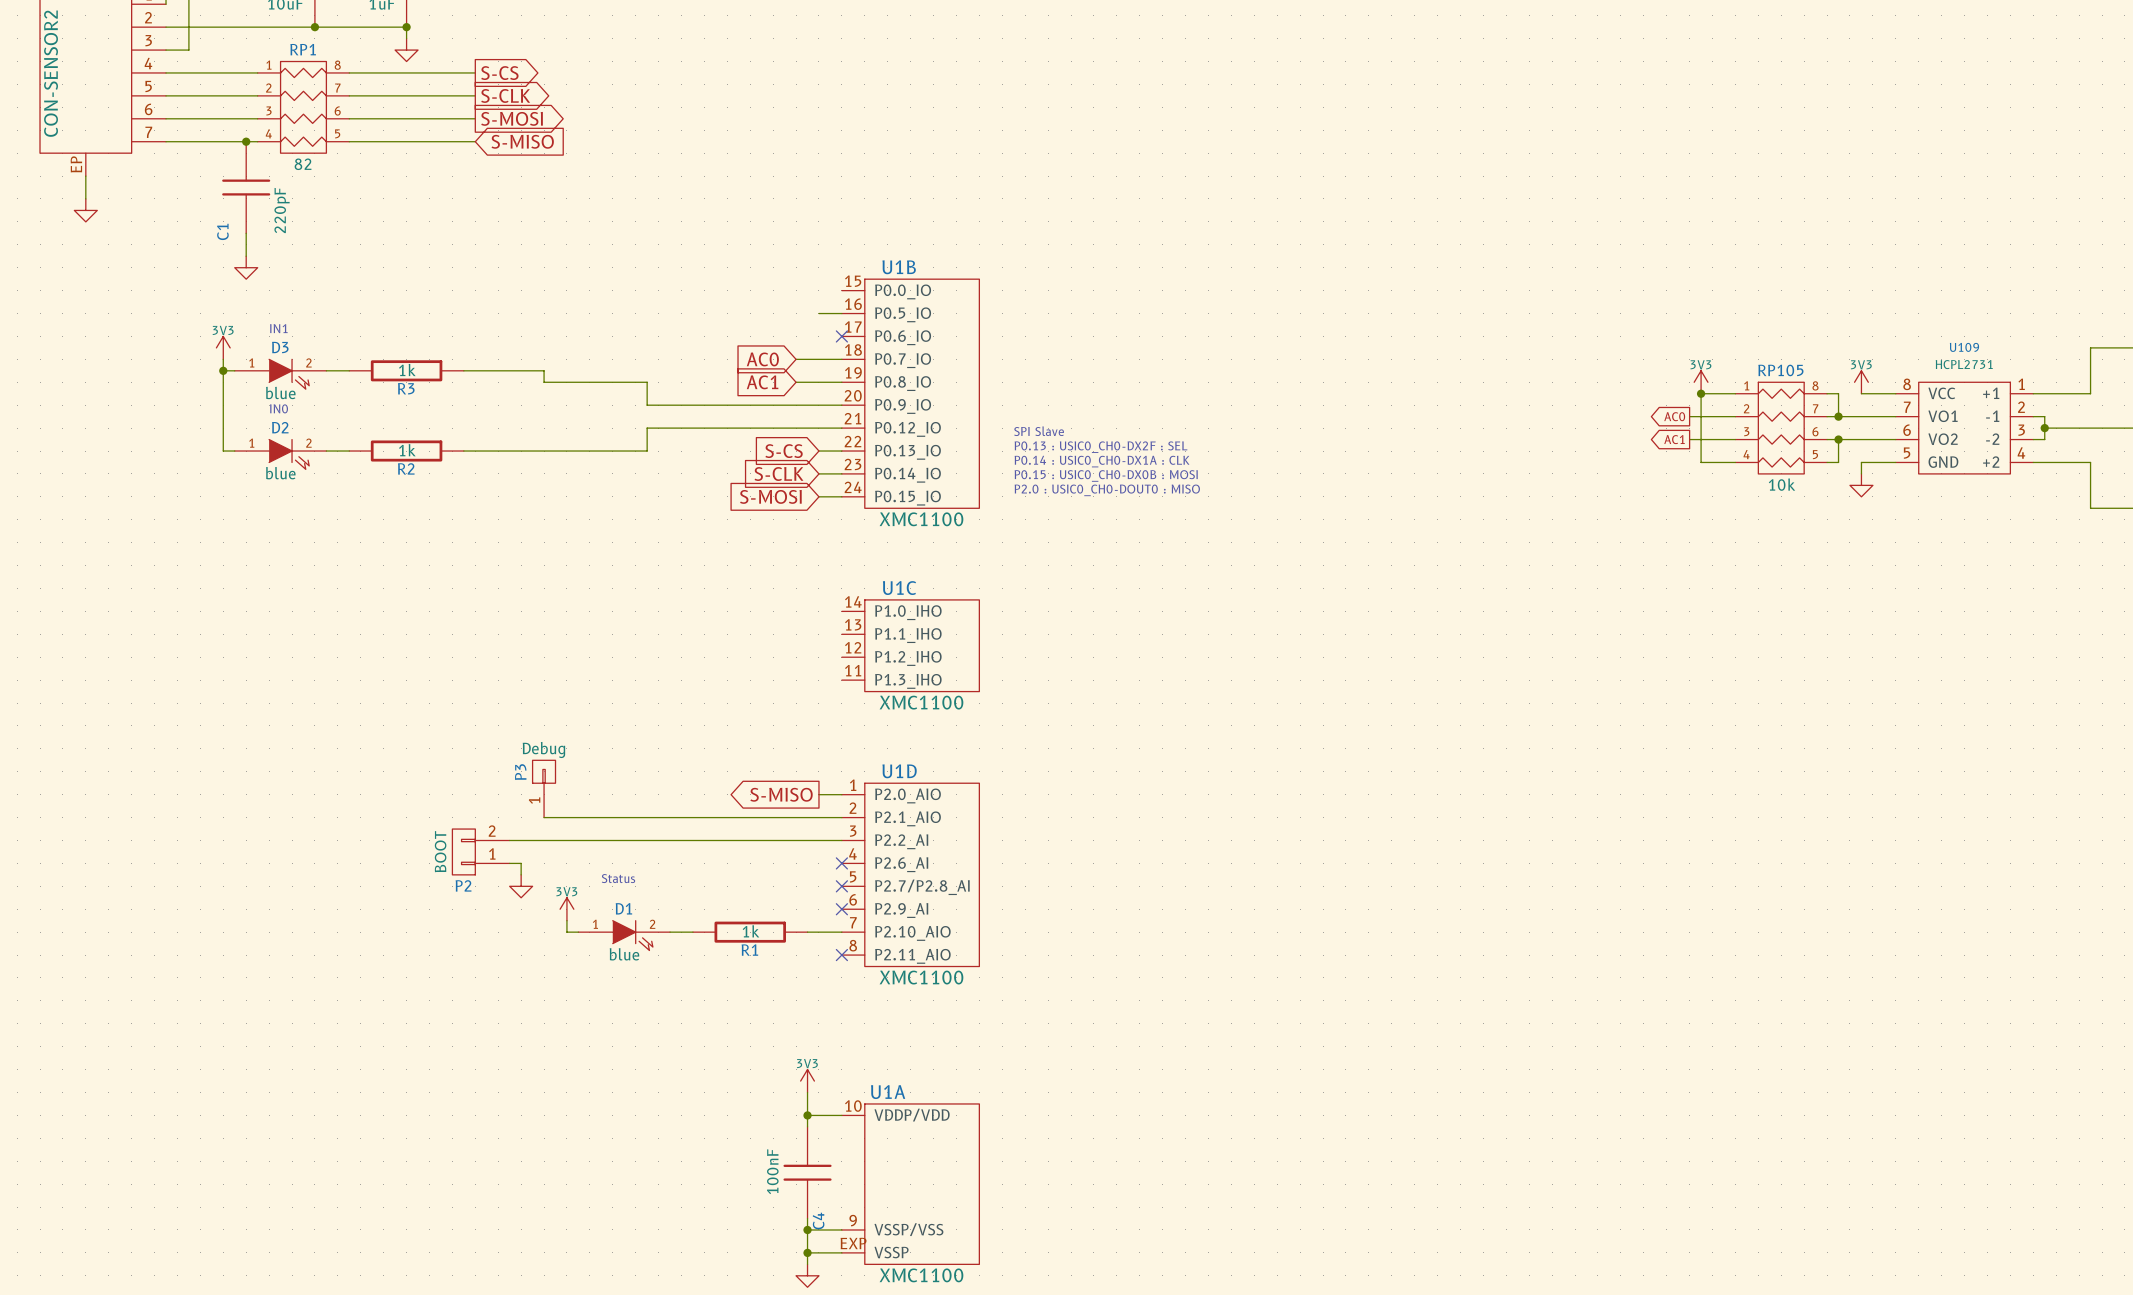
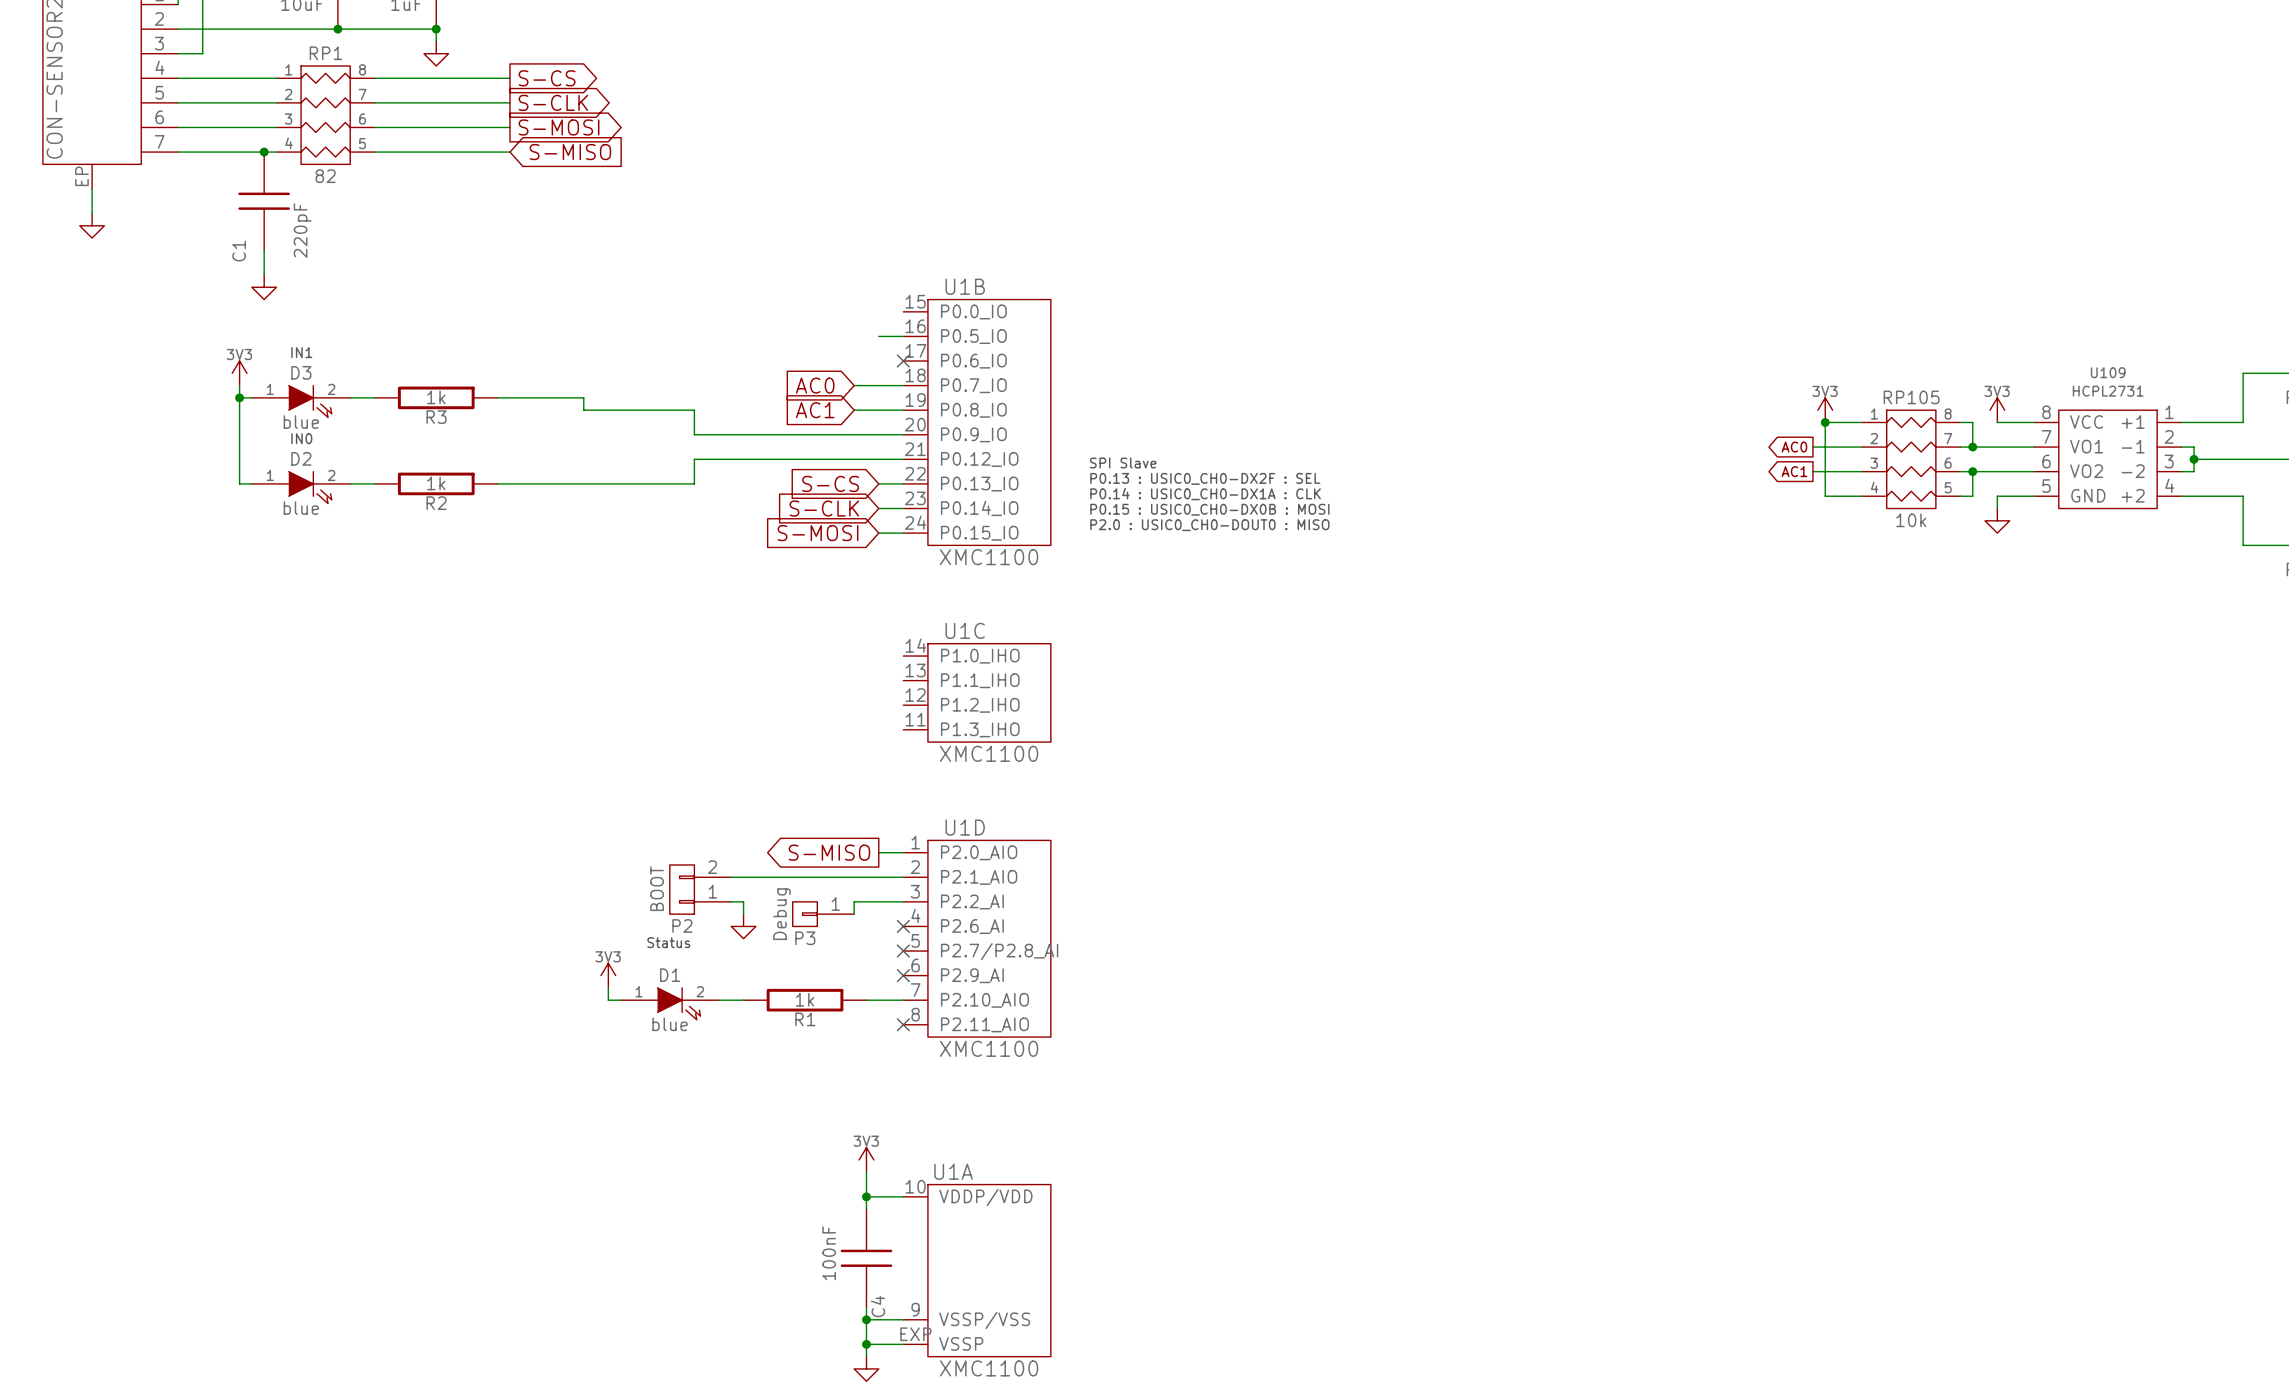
P3 rotation: 0° (544, 771) -> 90° counterclockwise (805, 914)
P3 position: (544, 788) -> (823, 914)
wire: (544, 817) (681, 817) -> none
wire: (509, 840) (681, 840) -> none
wire: (692, 840) (796, 840) -> (743, 901) (743, 914)
wire: none -> (854, 901) (854, 914)
P2 position: (481, 851) -> (700, 889)
wire: (509, 863) (521, 863) (521, 874) -> none
power symbol position: (521, 886) -> (743, 926)

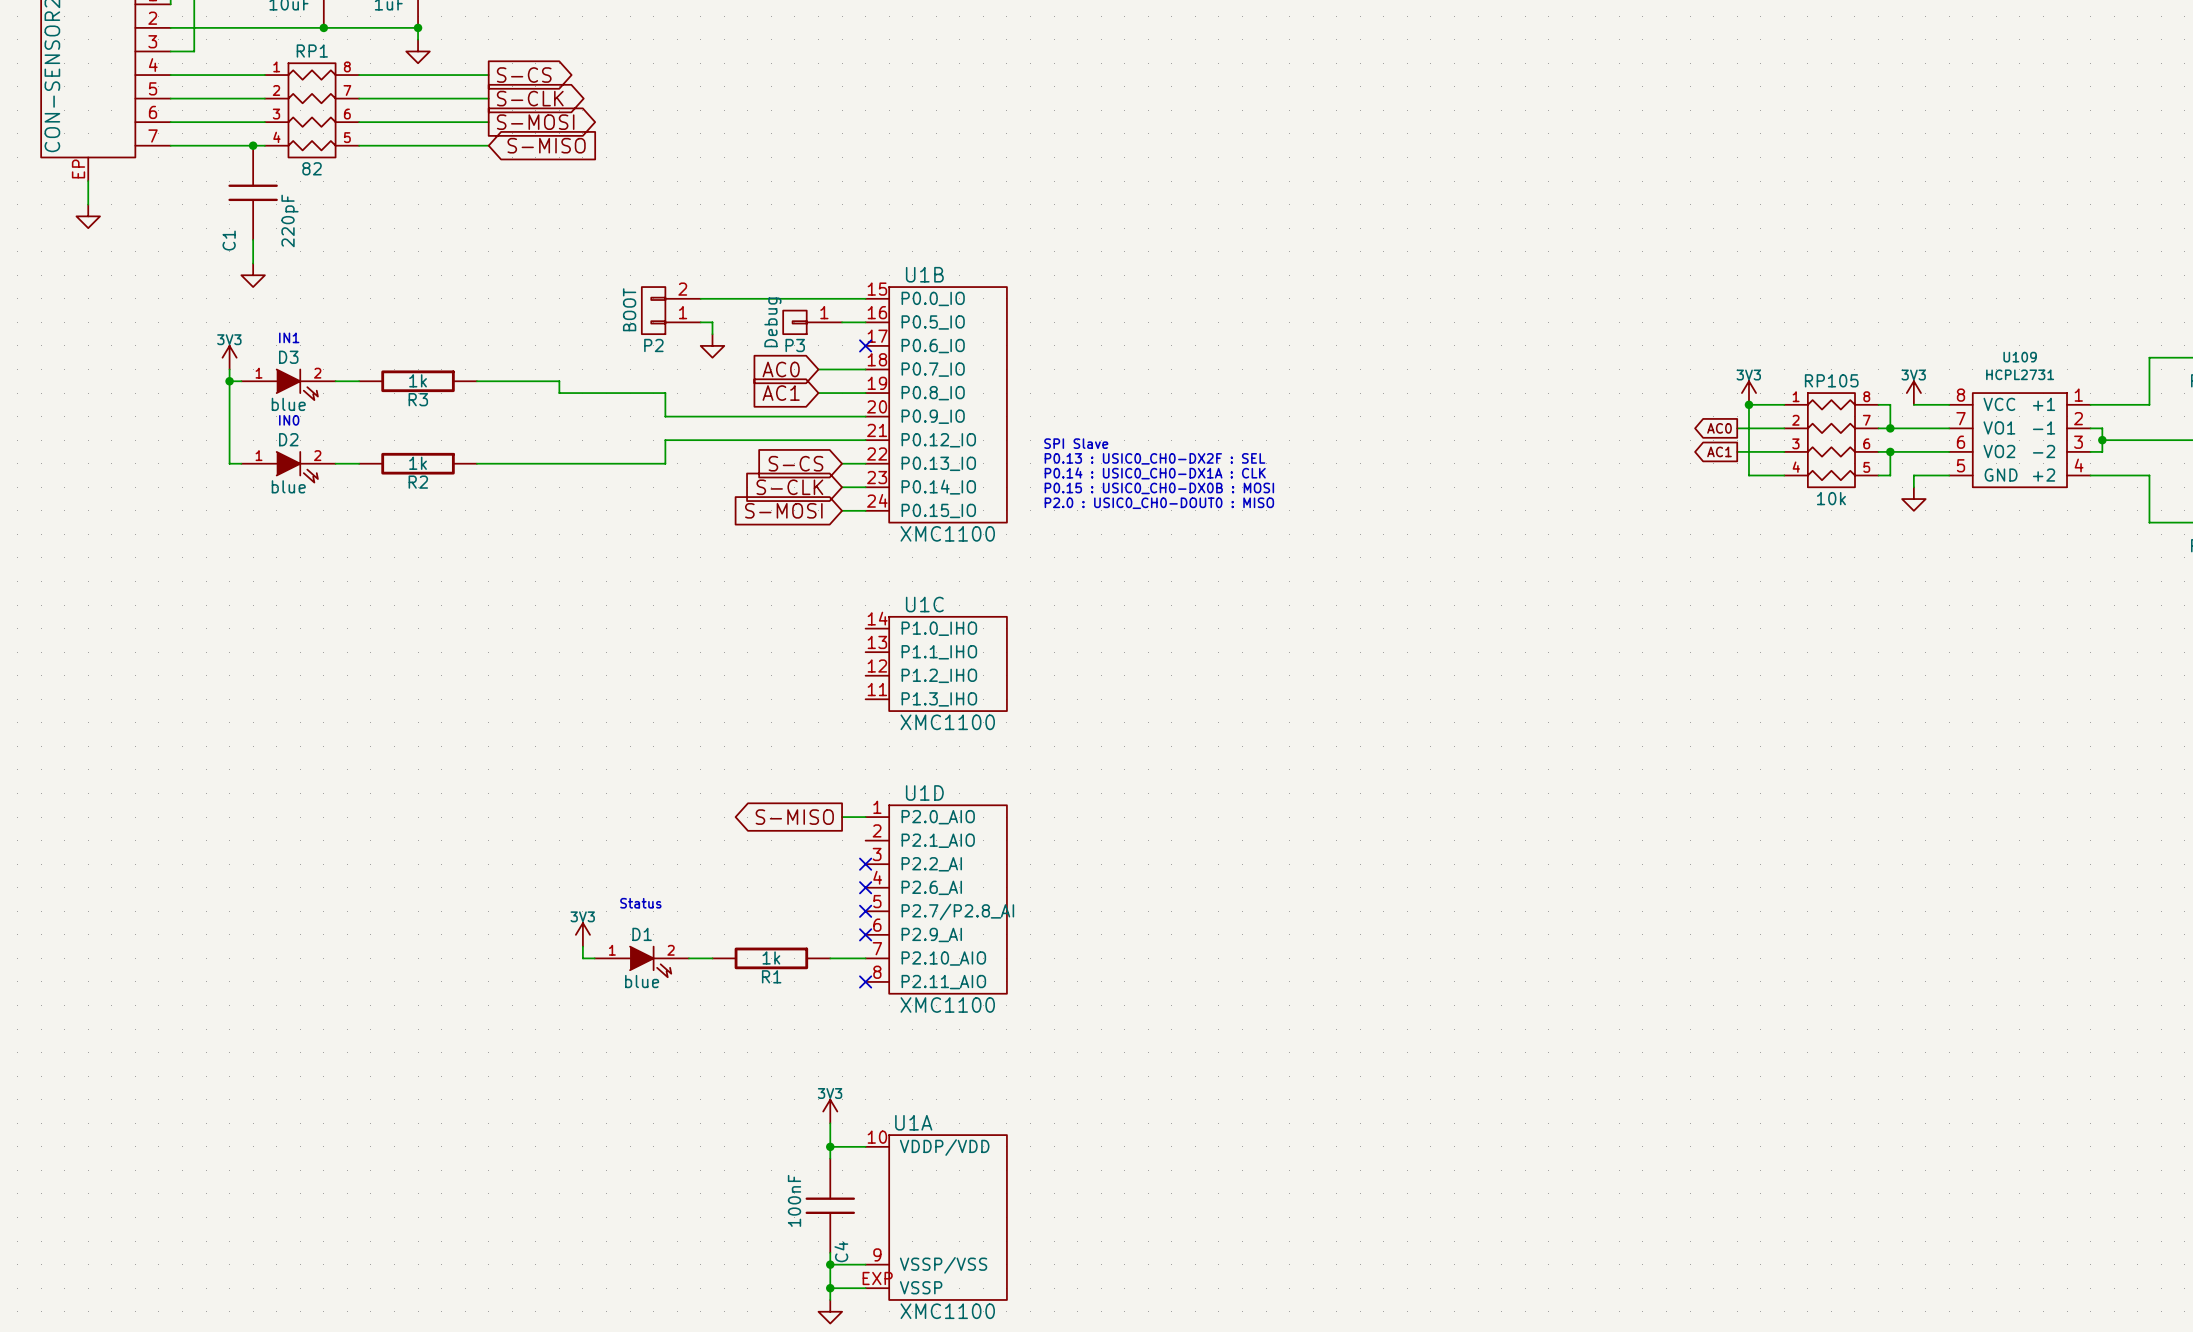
wire: none -> (700, 298) (865, 298)
wire: none -> (700, 322) (712, 322) (712, 334)
power symbol: none -> (712, 345)
wire: (731, 877) (903, 877) -> none
P2 position: (700, 889) -> (671, 310)
wire: (731, 901) (743, 901) (743, 914) -> none
wire: (903, 901) (854, 901) (854, 914) -> none
no-connect mark: none -> (865, 864)
P3 position: (823, 914) -> (812, 322)
power symbol: (743, 926) -> none

